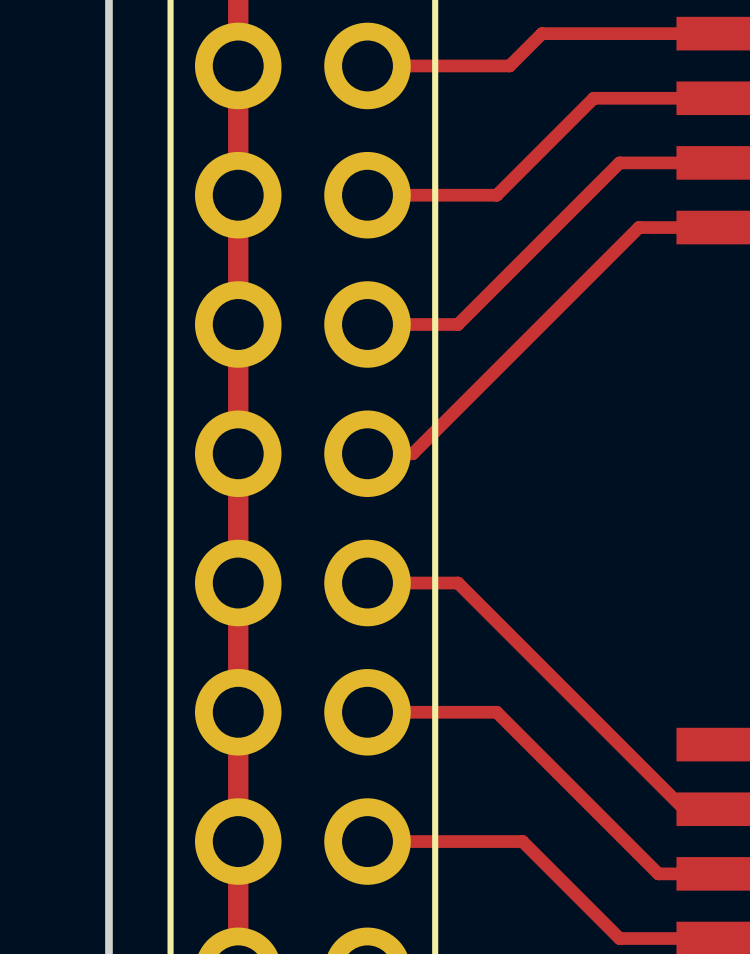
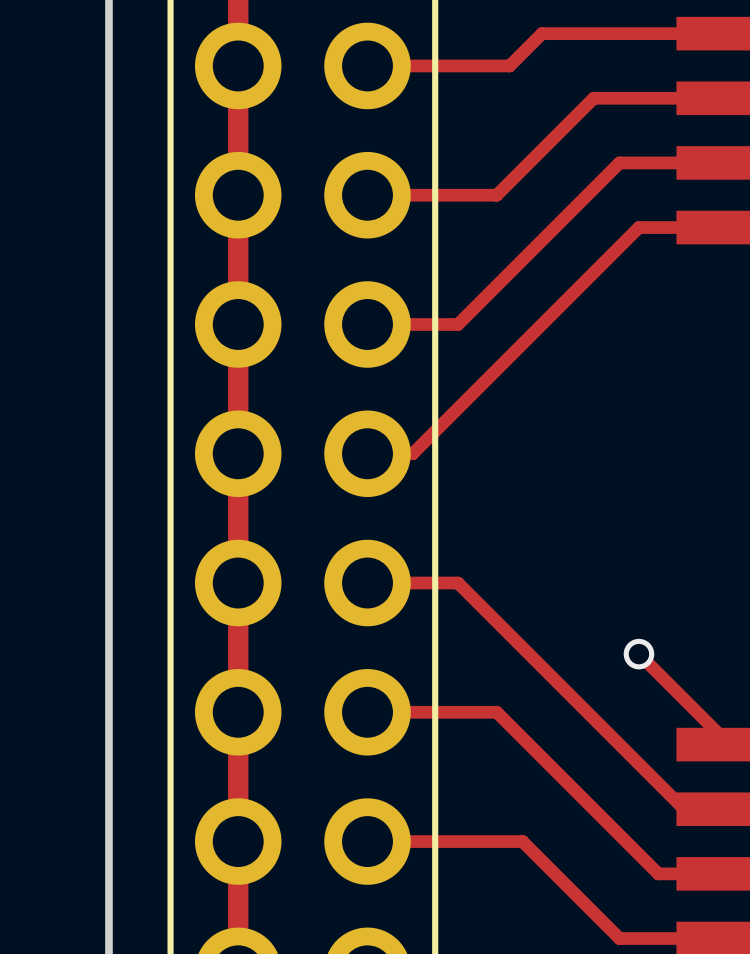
track: none -> (638, 654) (728, 744)
via: none -> (638, 654)

